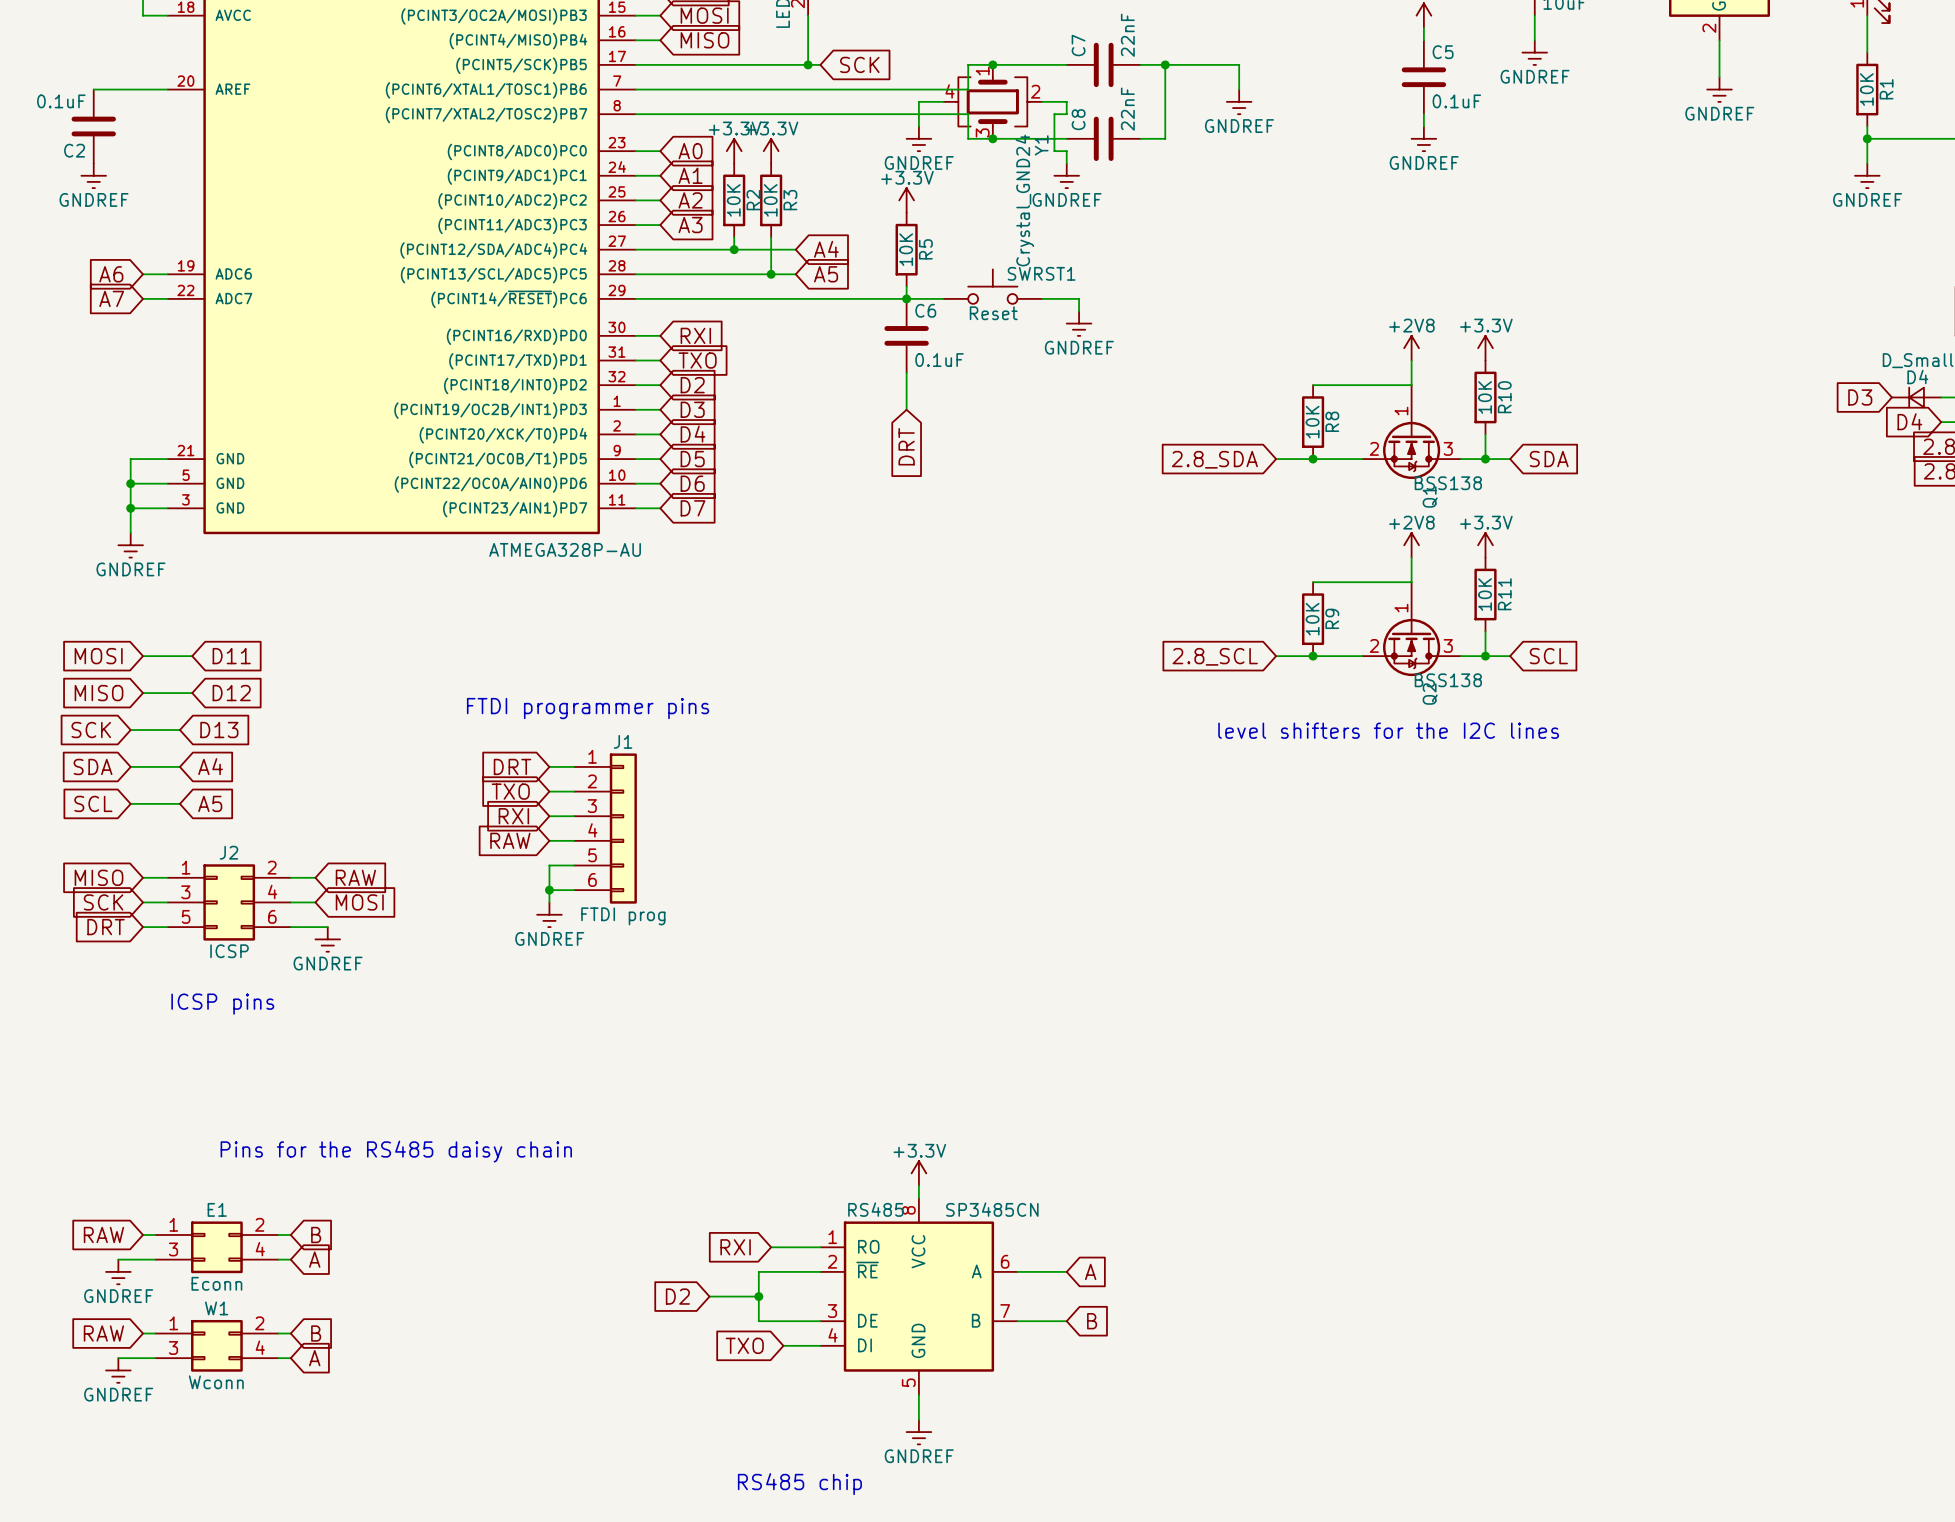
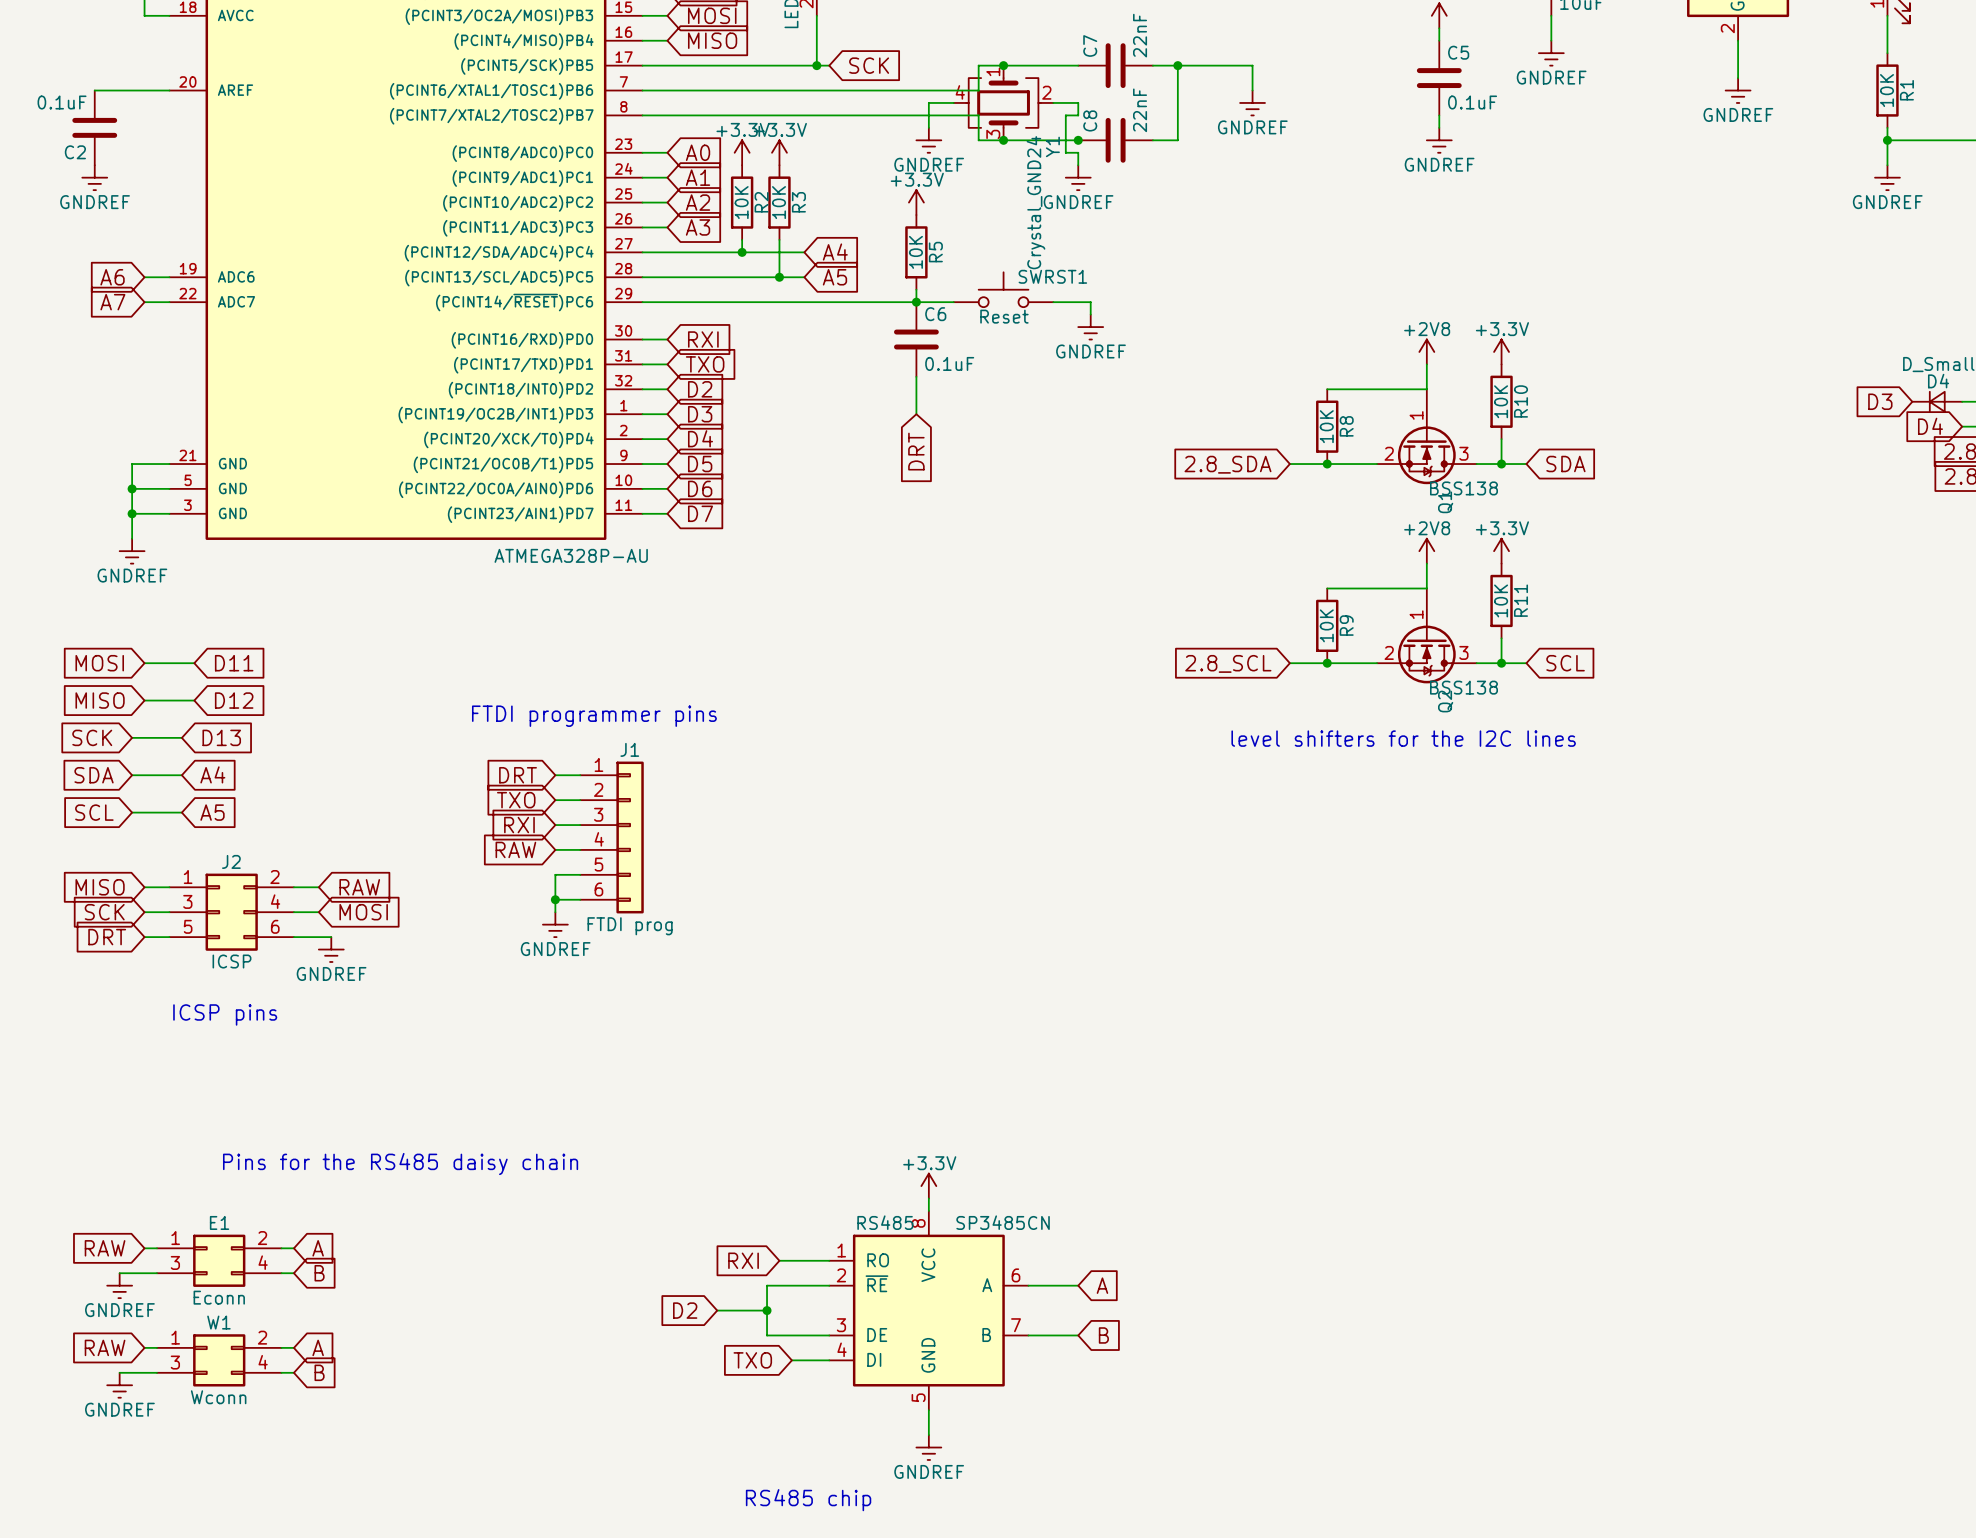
junction: none -> (1078, 140)
global label: B (316, 1234) -> A (318, 1248)
global label: A (314, 1259) -> B (319, 1273)
global label: B (316, 1333) -> A (318, 1347)
global label: A (314, 1358) -> B (319, 1372)

